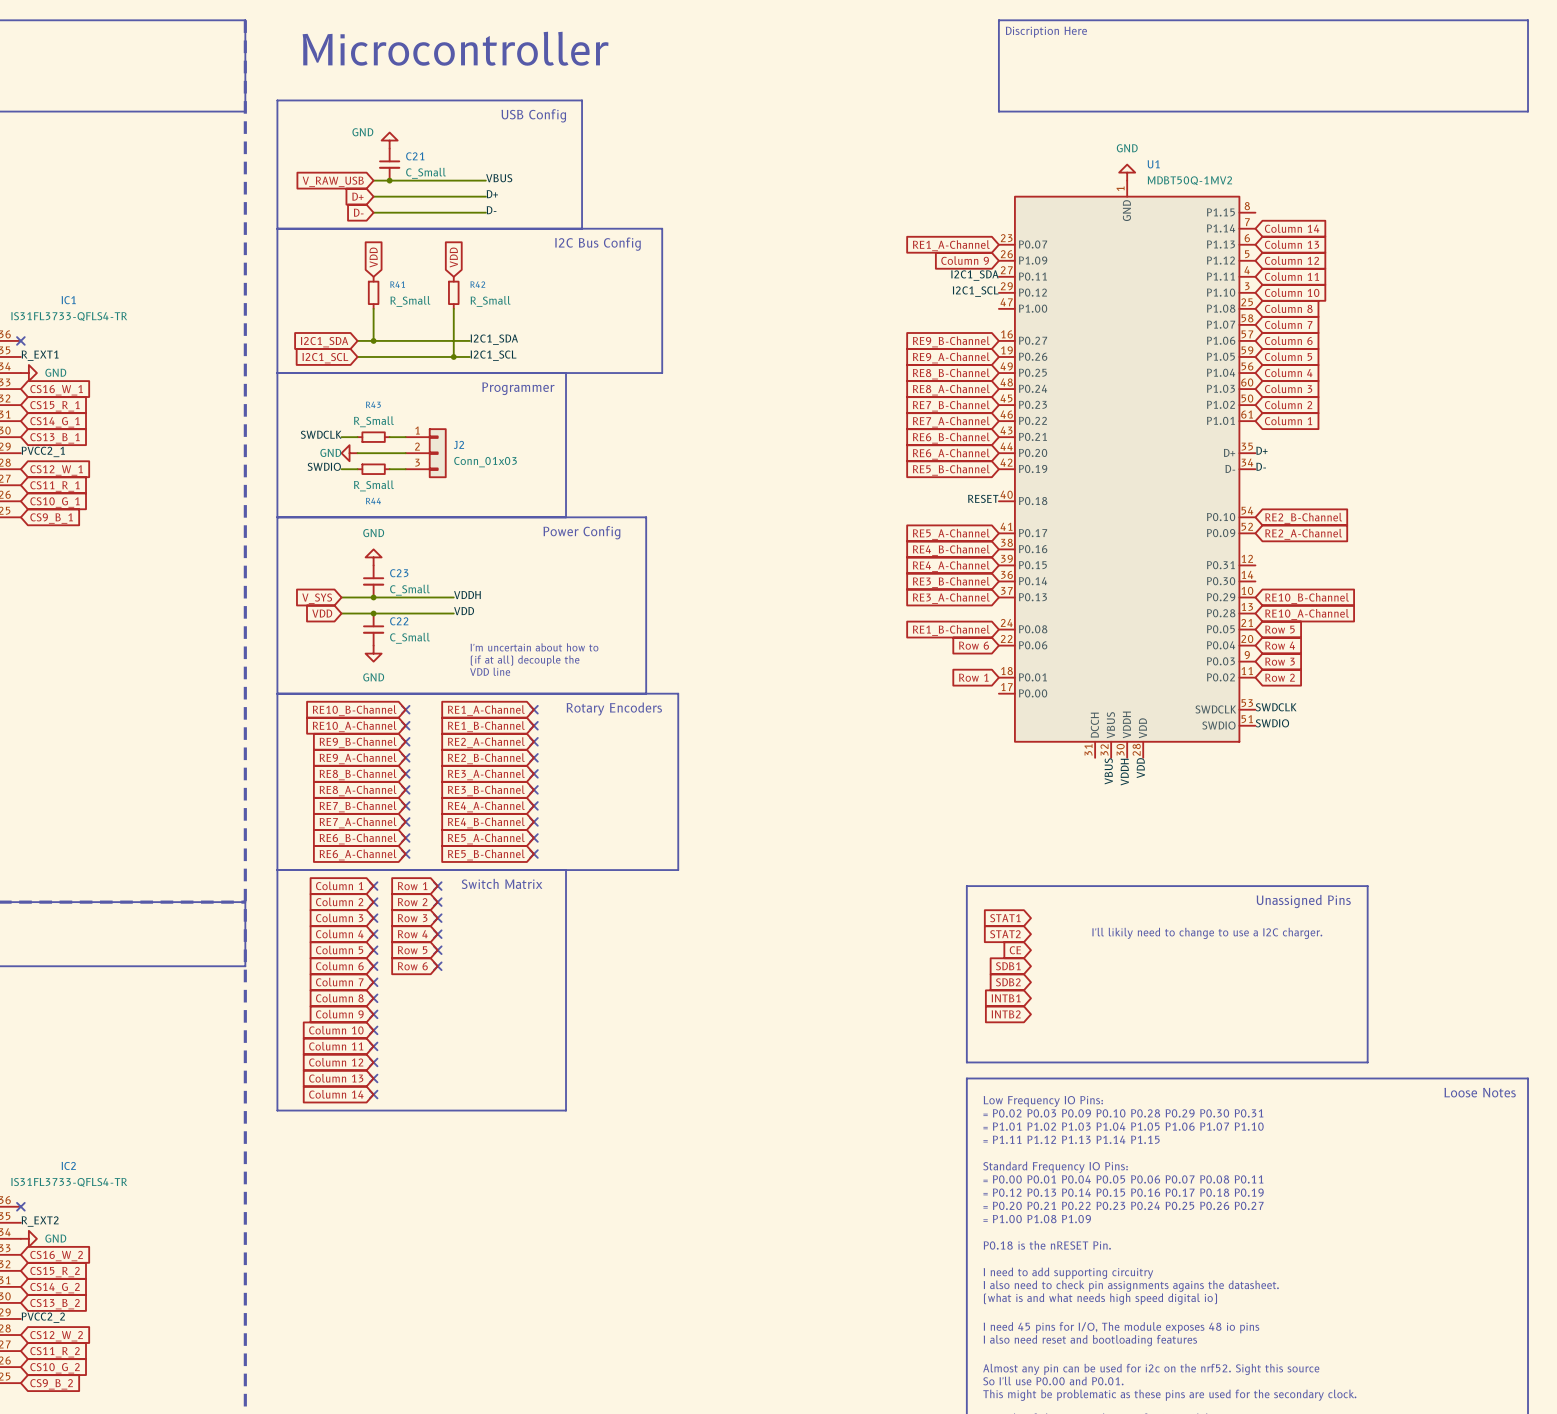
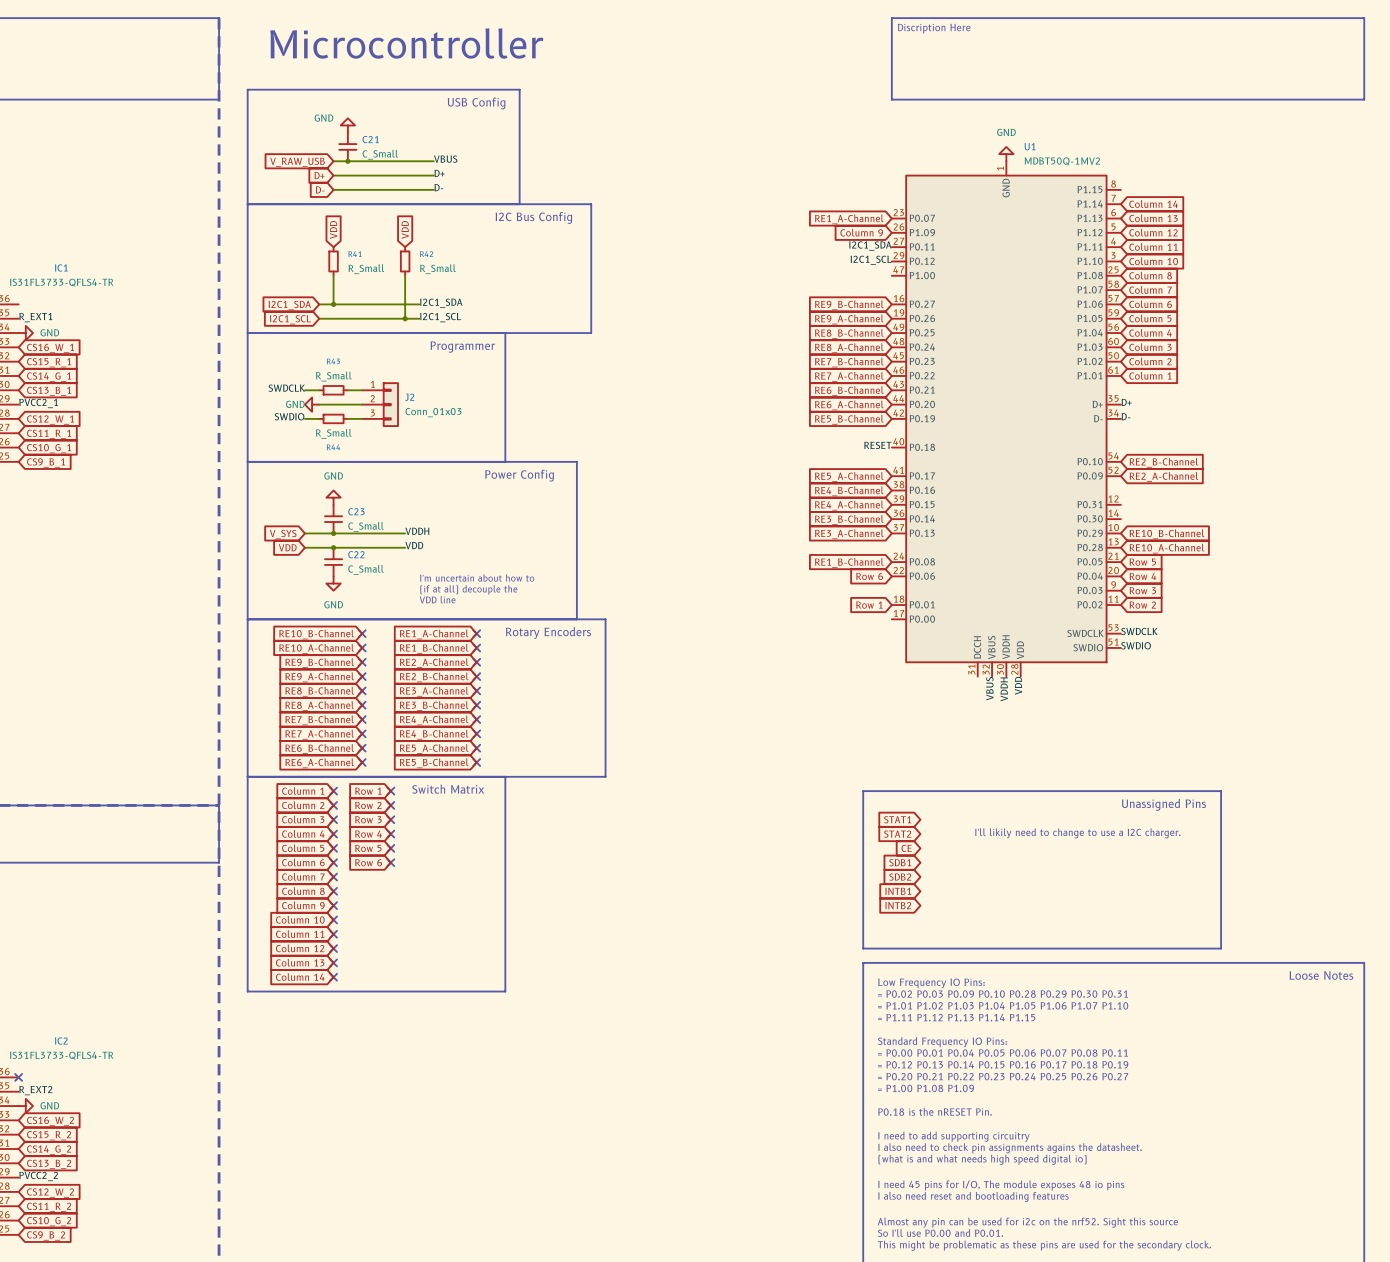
no-connect mark: (20, 340) -> none

